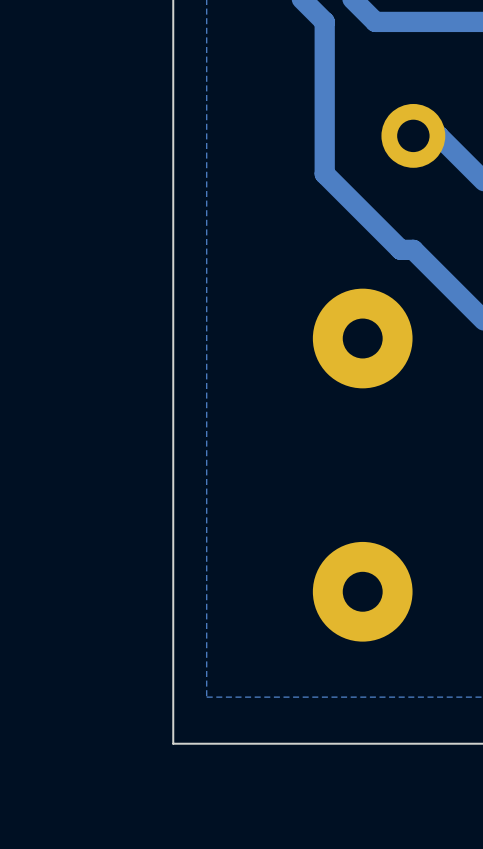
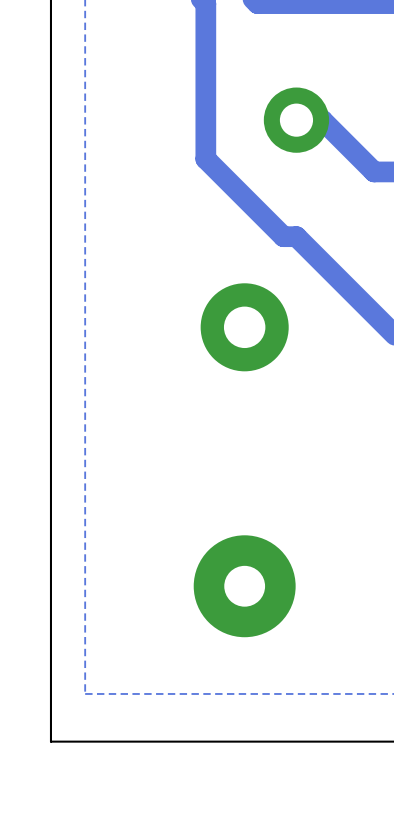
part footprint: [312, 288, 413, 389] -> [200, 283, 289, 372]

